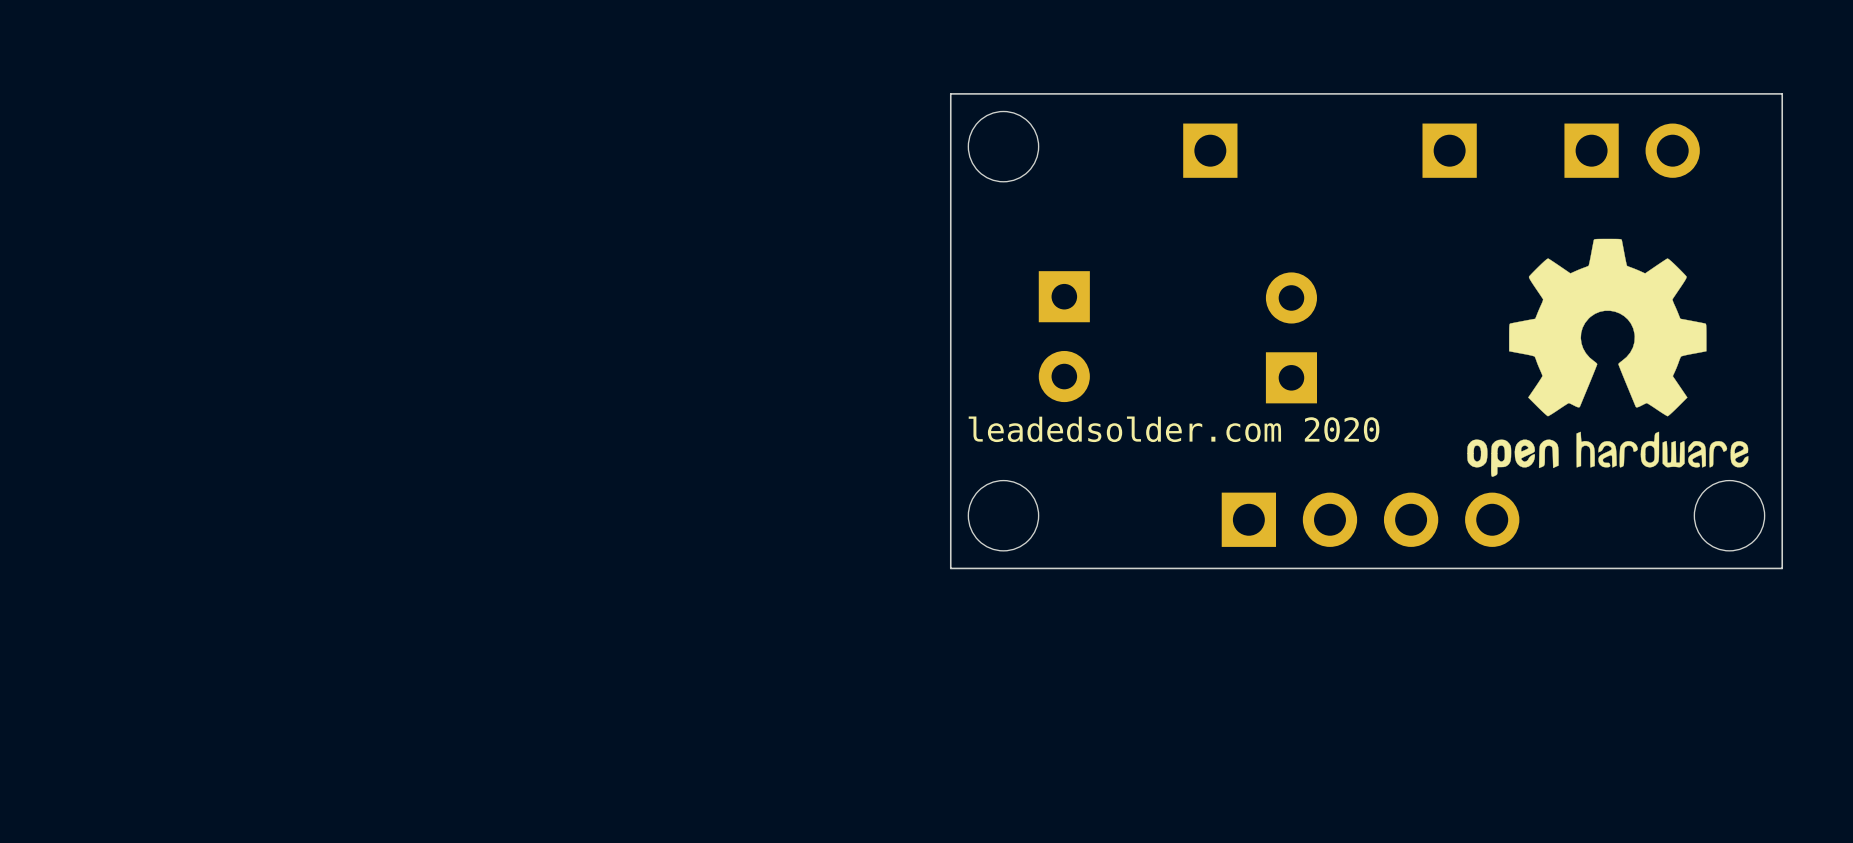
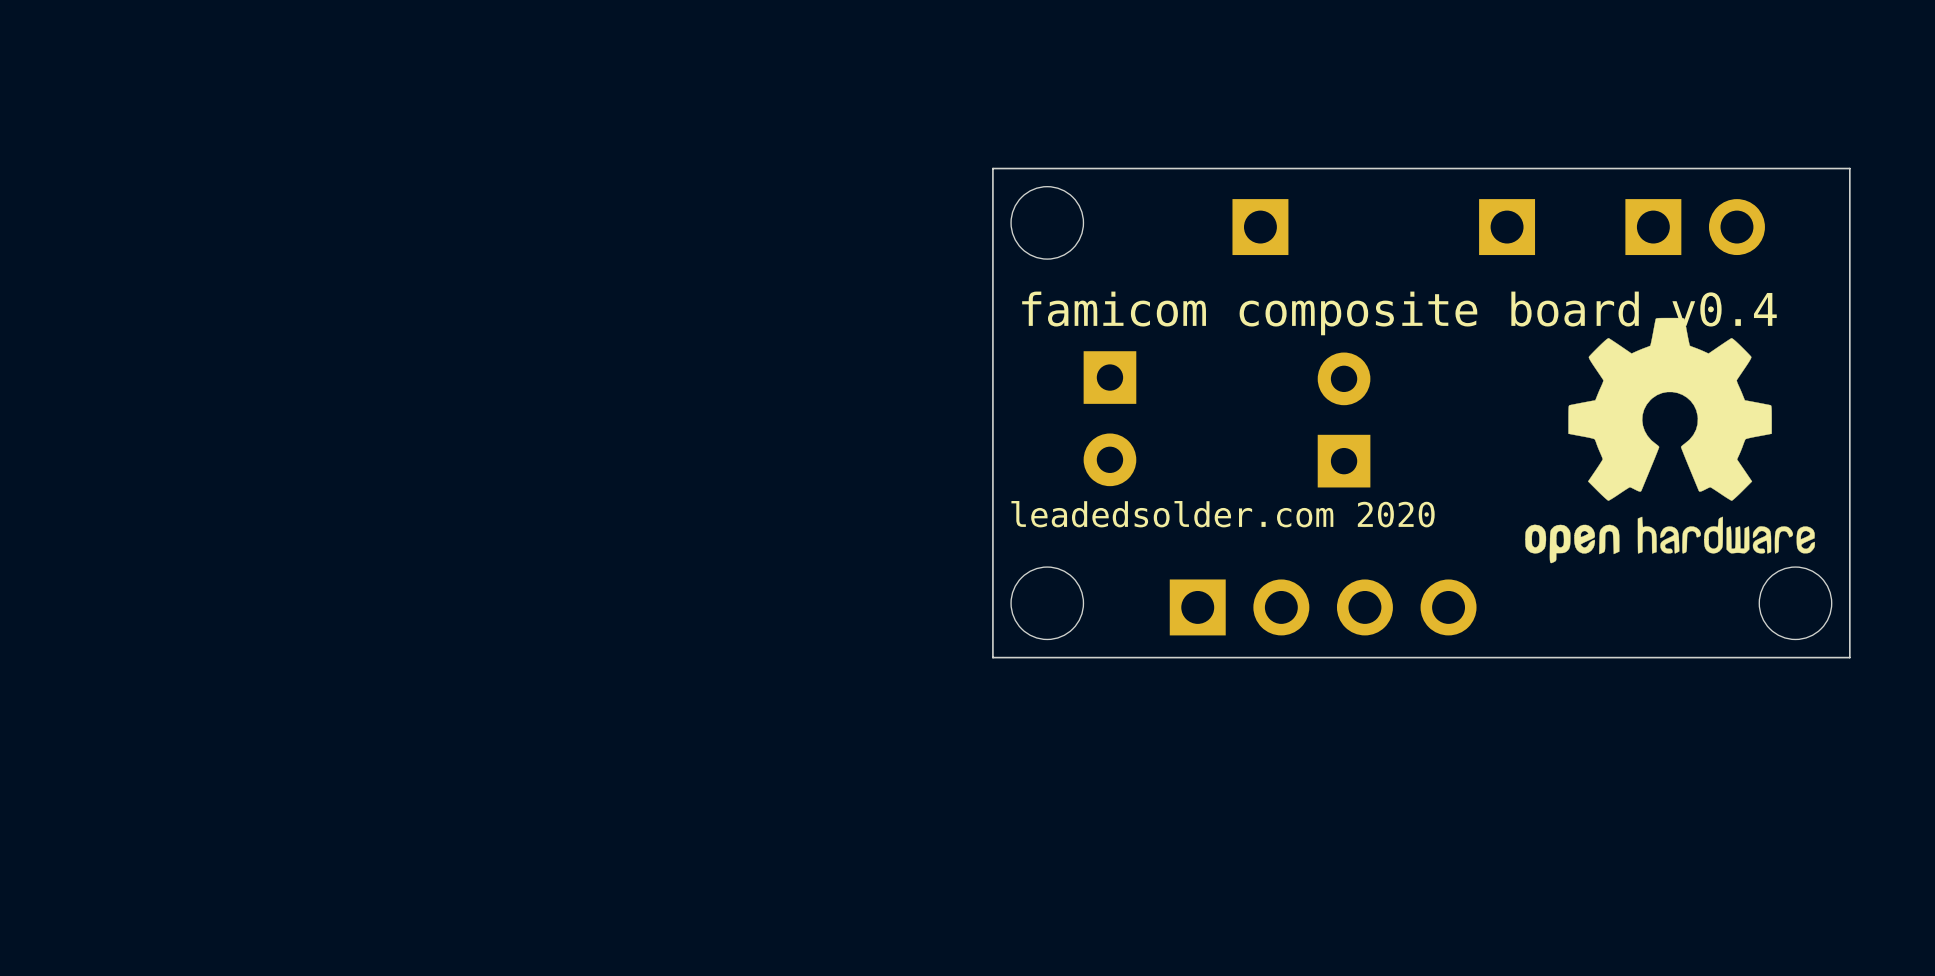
text: none -> famicom composite board v0.4 (1399, 313)
part position: (1370, 519) -> (1323, 607)

